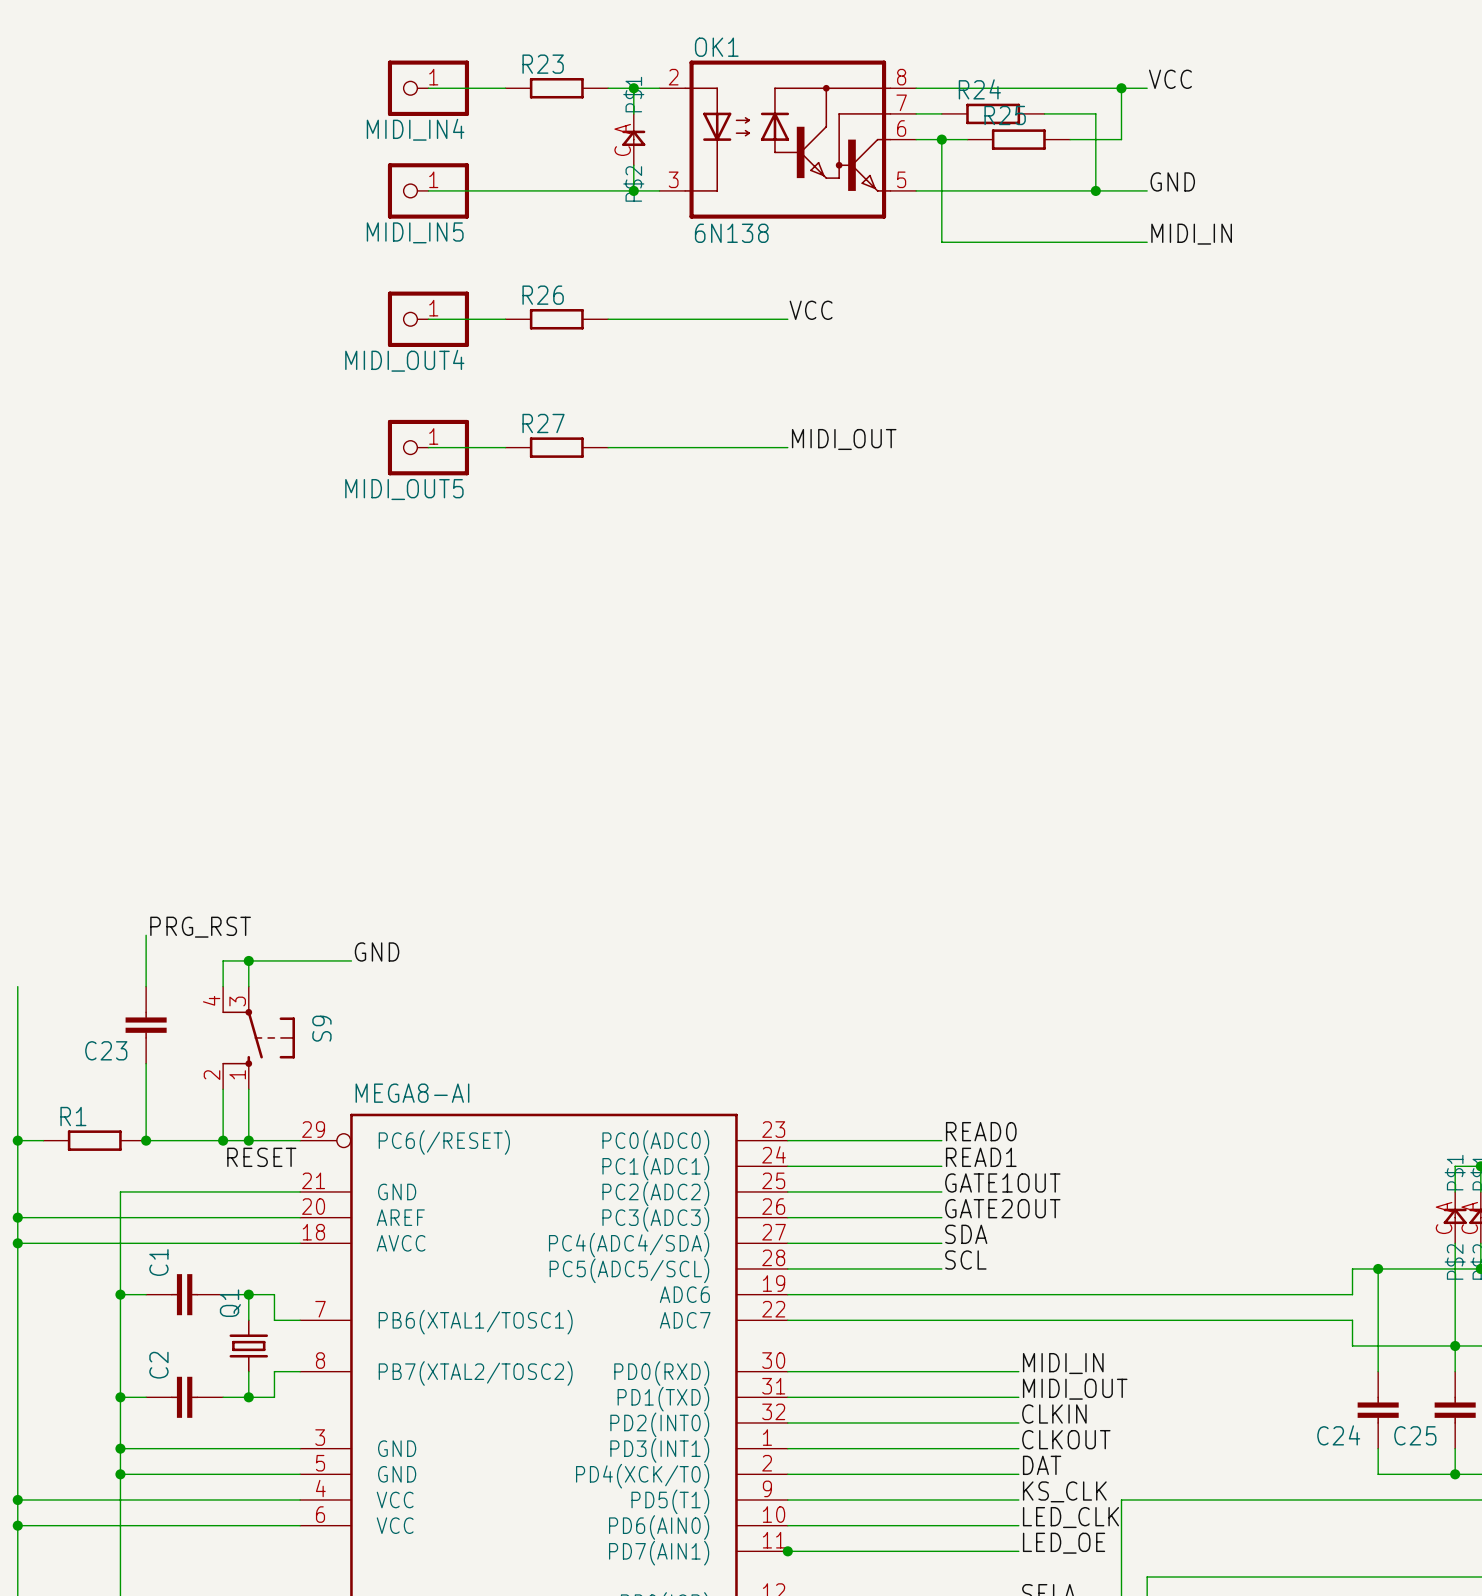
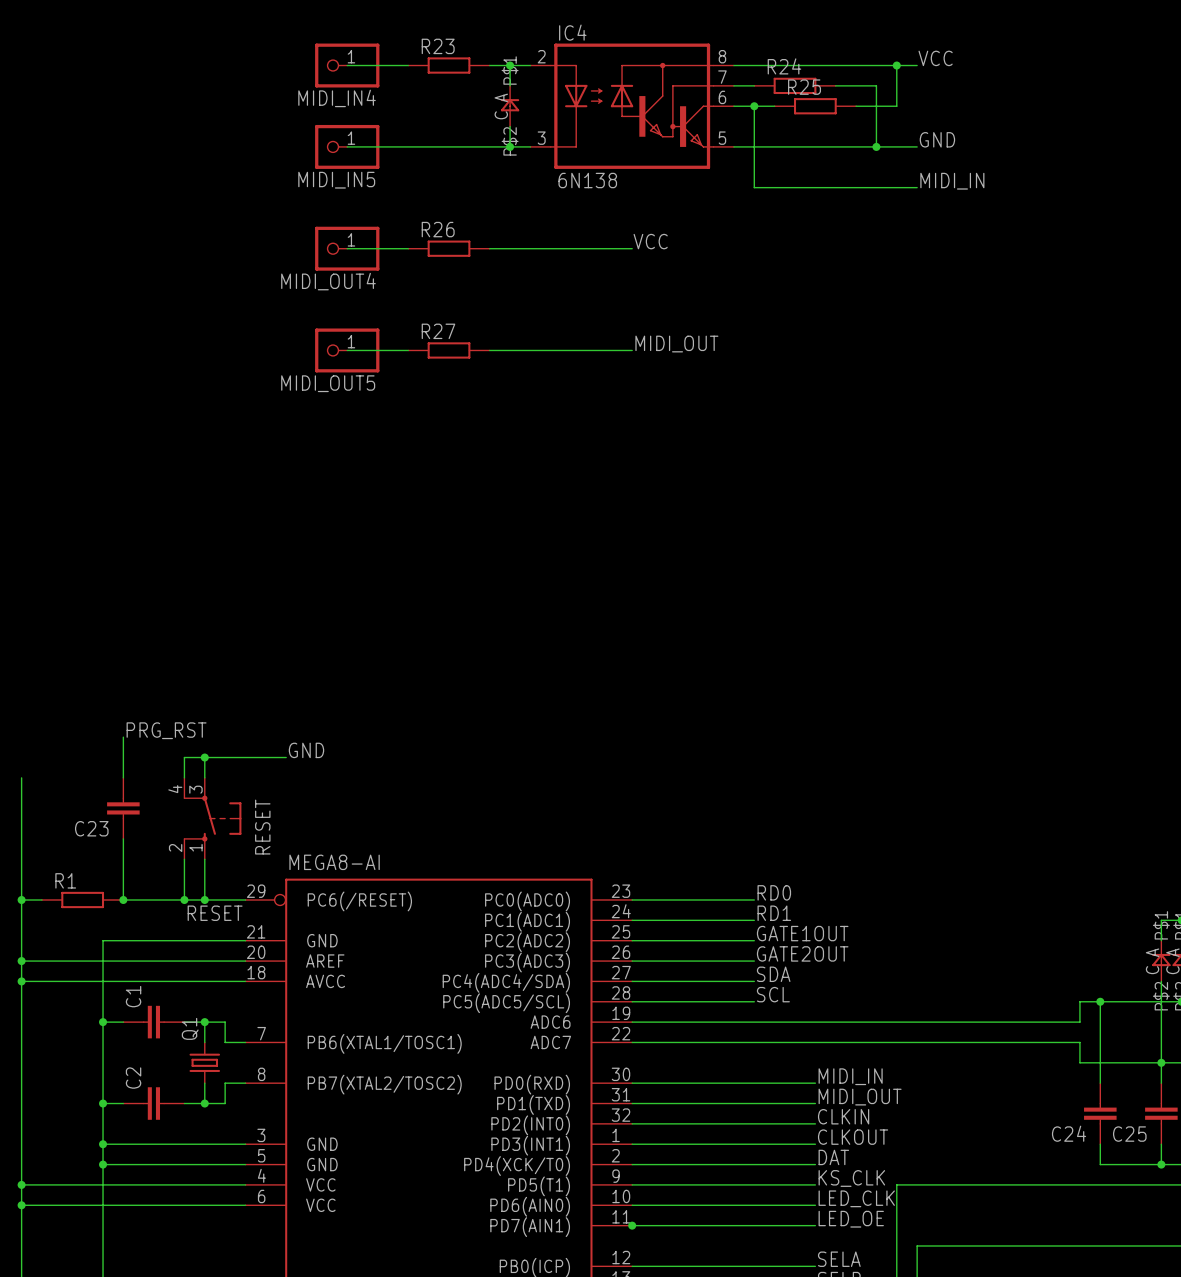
OK1 name: OK1 (716, 47) -> IC4 (572, 32)
S9 name: S9 (321, 1028) -> RESET (262, 827)
label: READ0 (981, 1131) -> RD0 (774, 892)
label: READ1 (981, 1157) -> RD1 (774, 913)

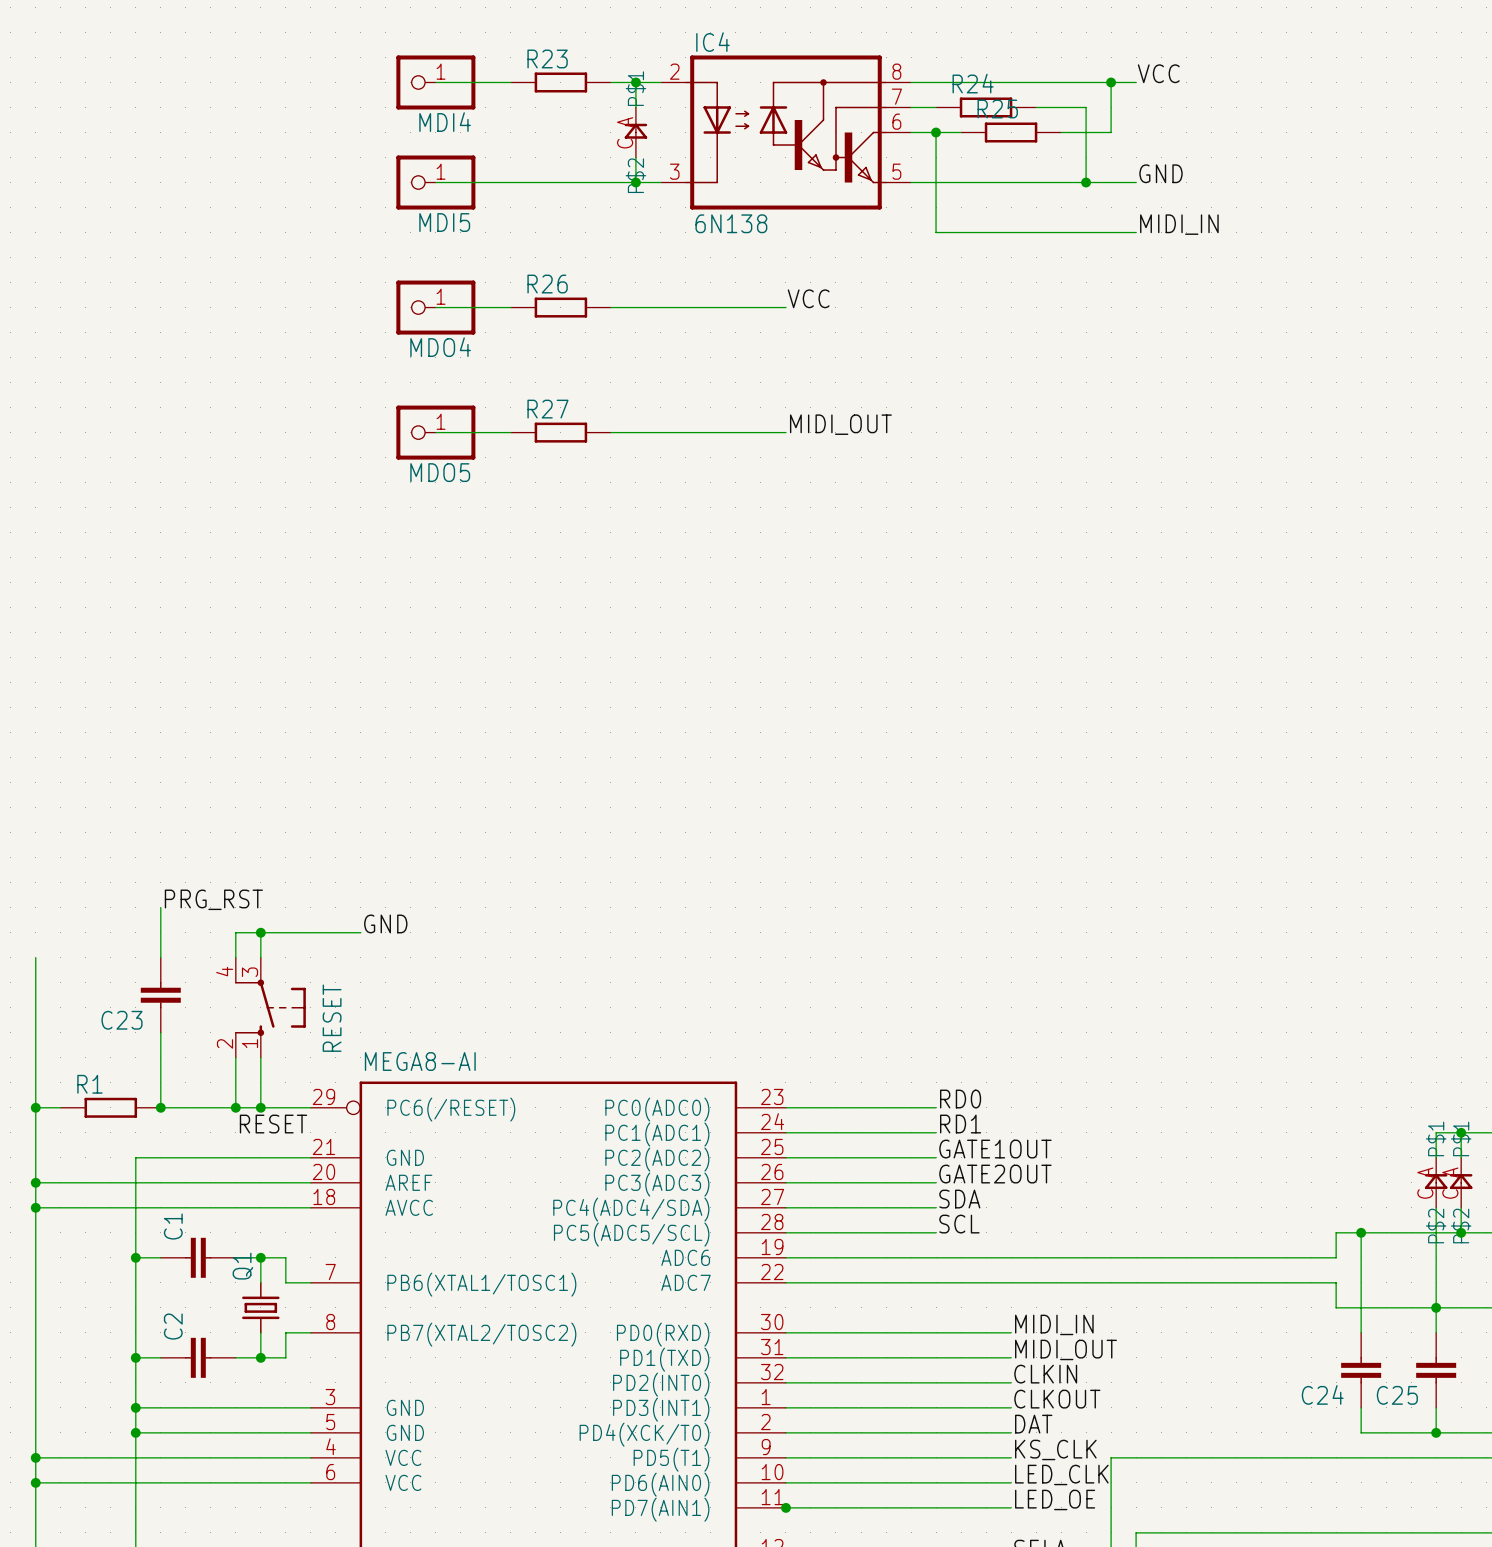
MIDI_IN4 name: MIDI_IN4 (337, 98) -> MDI4 (445, 122)
MIDI_IN5 name: MIDI_IN5 (336, 180) -> MDI5 (444, 222)
MIDI_OUT4 name: MIDI_OUT4 (328, 281) -> MDO4 (440, 347)
MIDI_OUT5 name: MIDI_OUT5 (328, 383) -> MDO5 (440, 472)

